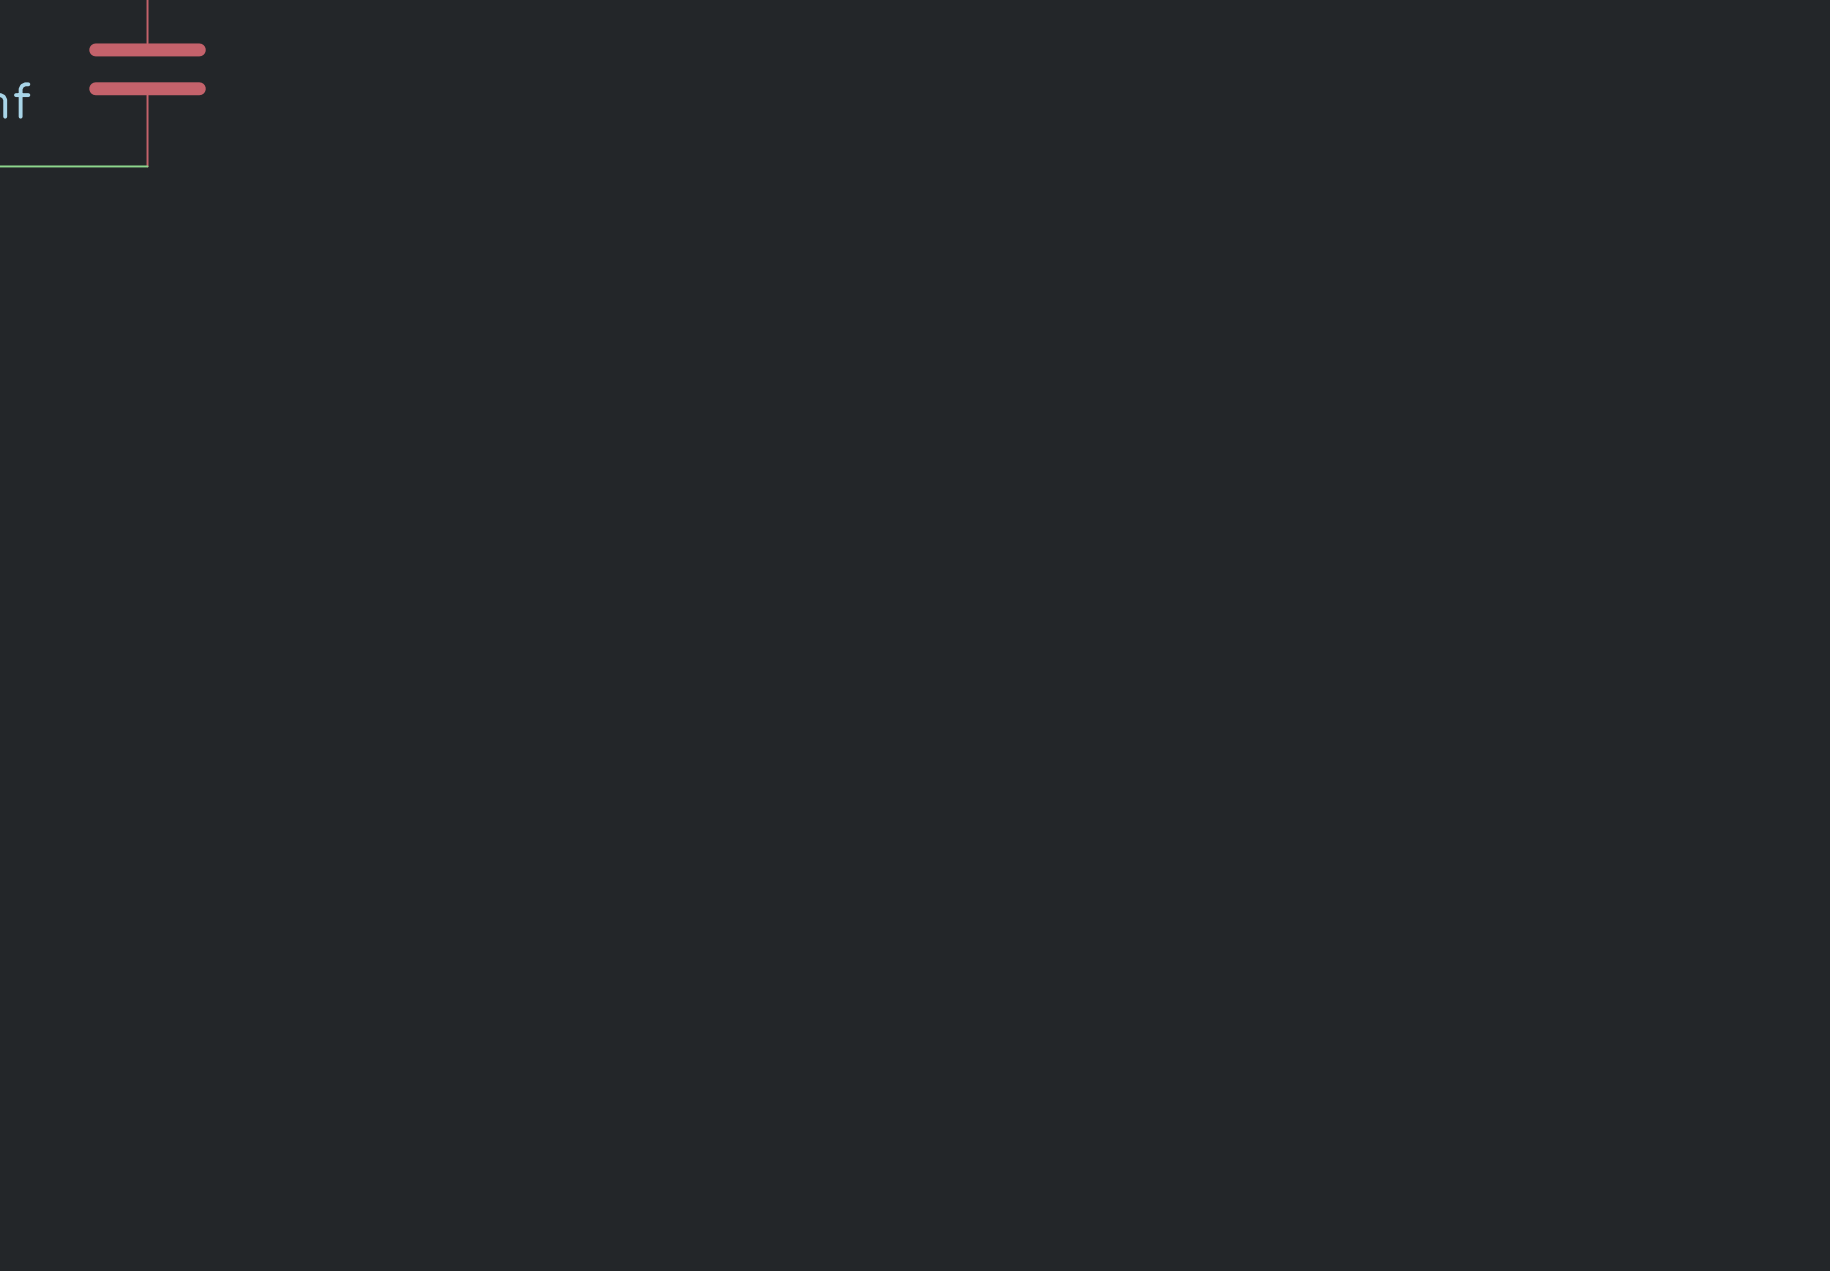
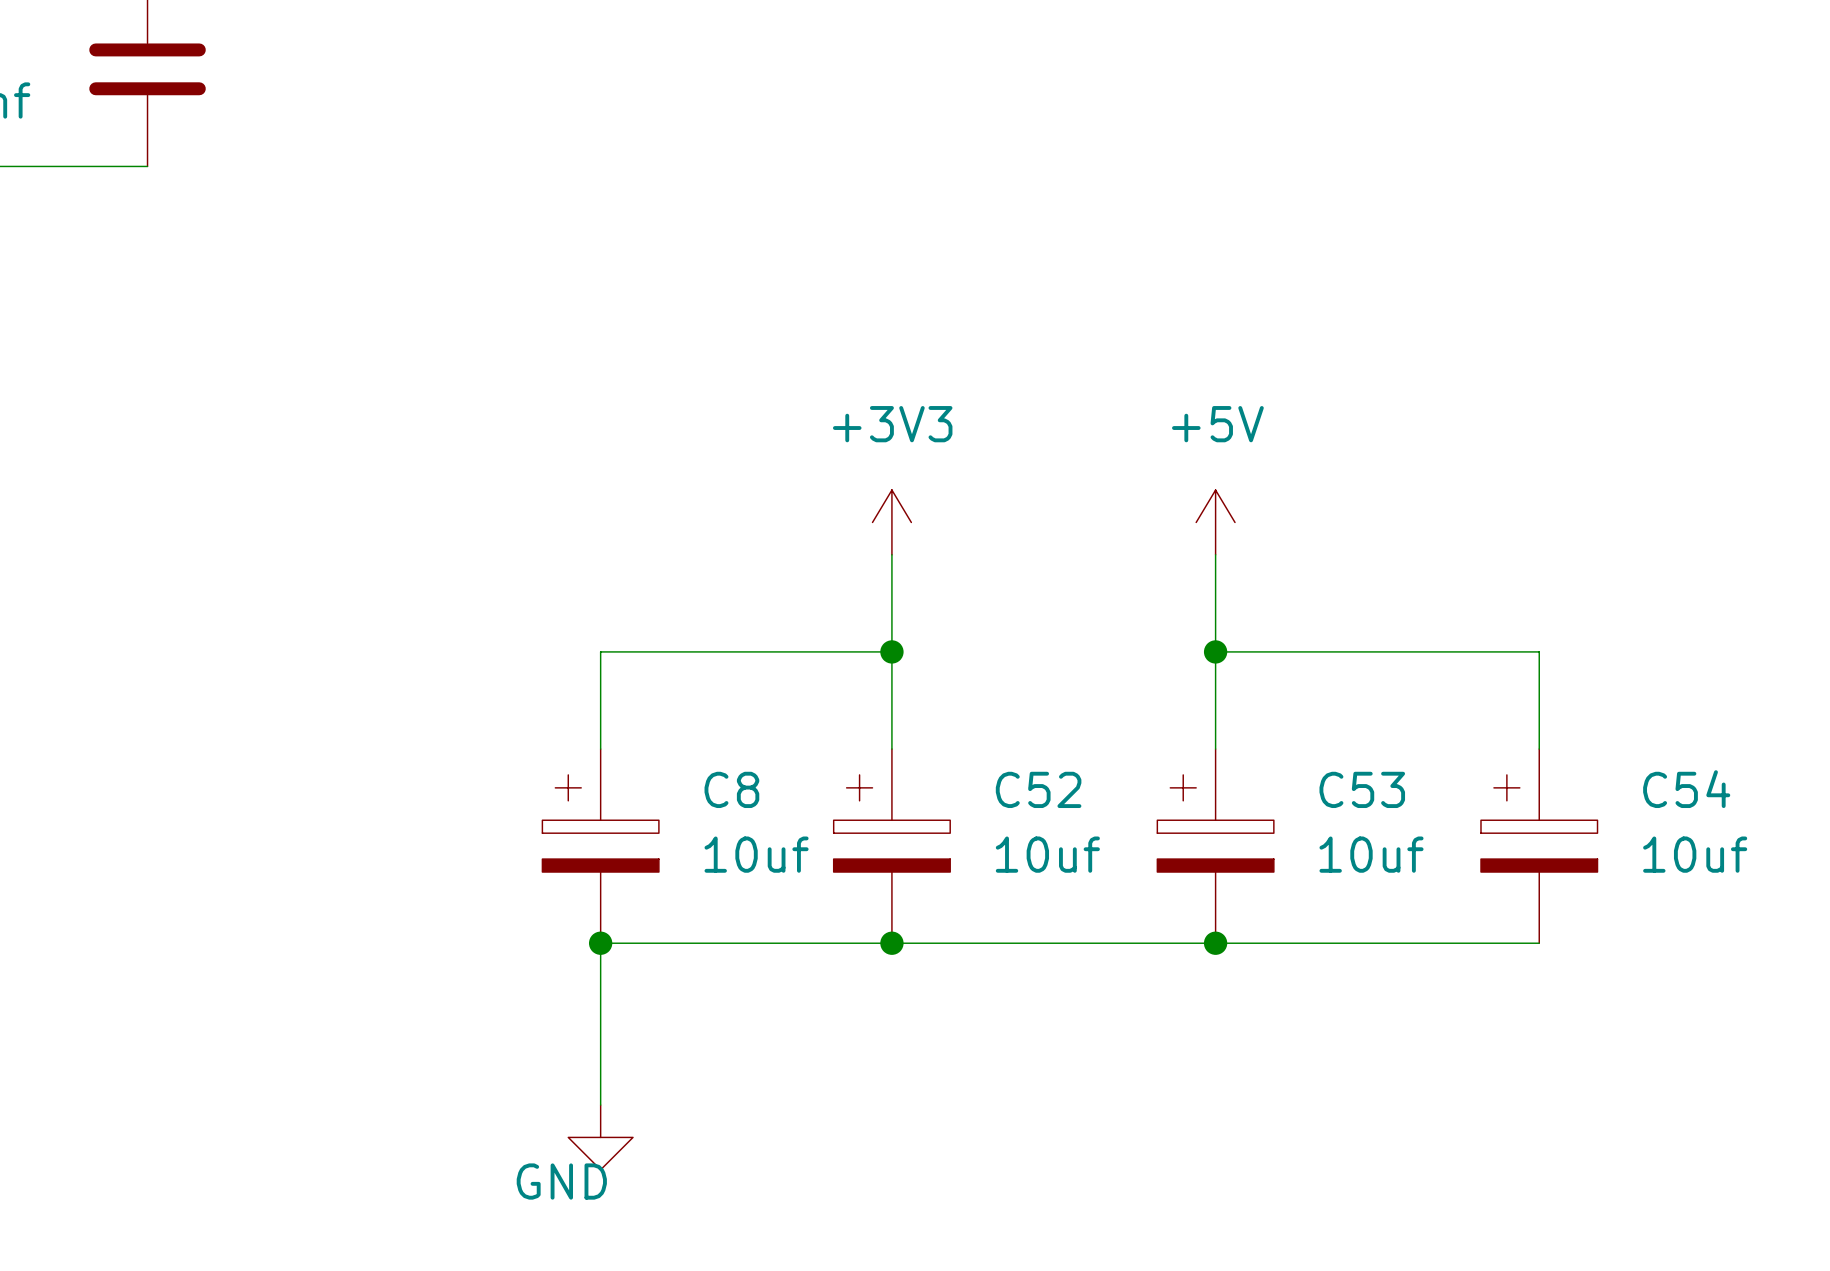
power symbol: none -> +3V3 (891, 522)
power symbol: none -> +5V (1215, 522)
wire: none -> (891, 554) (891, 749)
wire: none -> (1215, 554) (1215, 749)
wire: none -> (891, 651) (600, 651) (600, 749)
junction: none -> (891, 651)
wire: none -> (1215, 651) (1539, 651) (1539, 749)
junction: none -> (1215, 651)
C8: none -> 10uf (600, 846)
C52: none -> 10uf (891, 846)
C53: none -> 10uf (1215, 846)
C54: none -> 10uf (1539, 846)
junction: none -> (600, 943)
junction: none -> (891, 943)
junction: none -> (1215, 943)
wire: none -> (1539, 943) (600, 943) (600, 1105)
power symbol: none -> GND (600, 1137)

